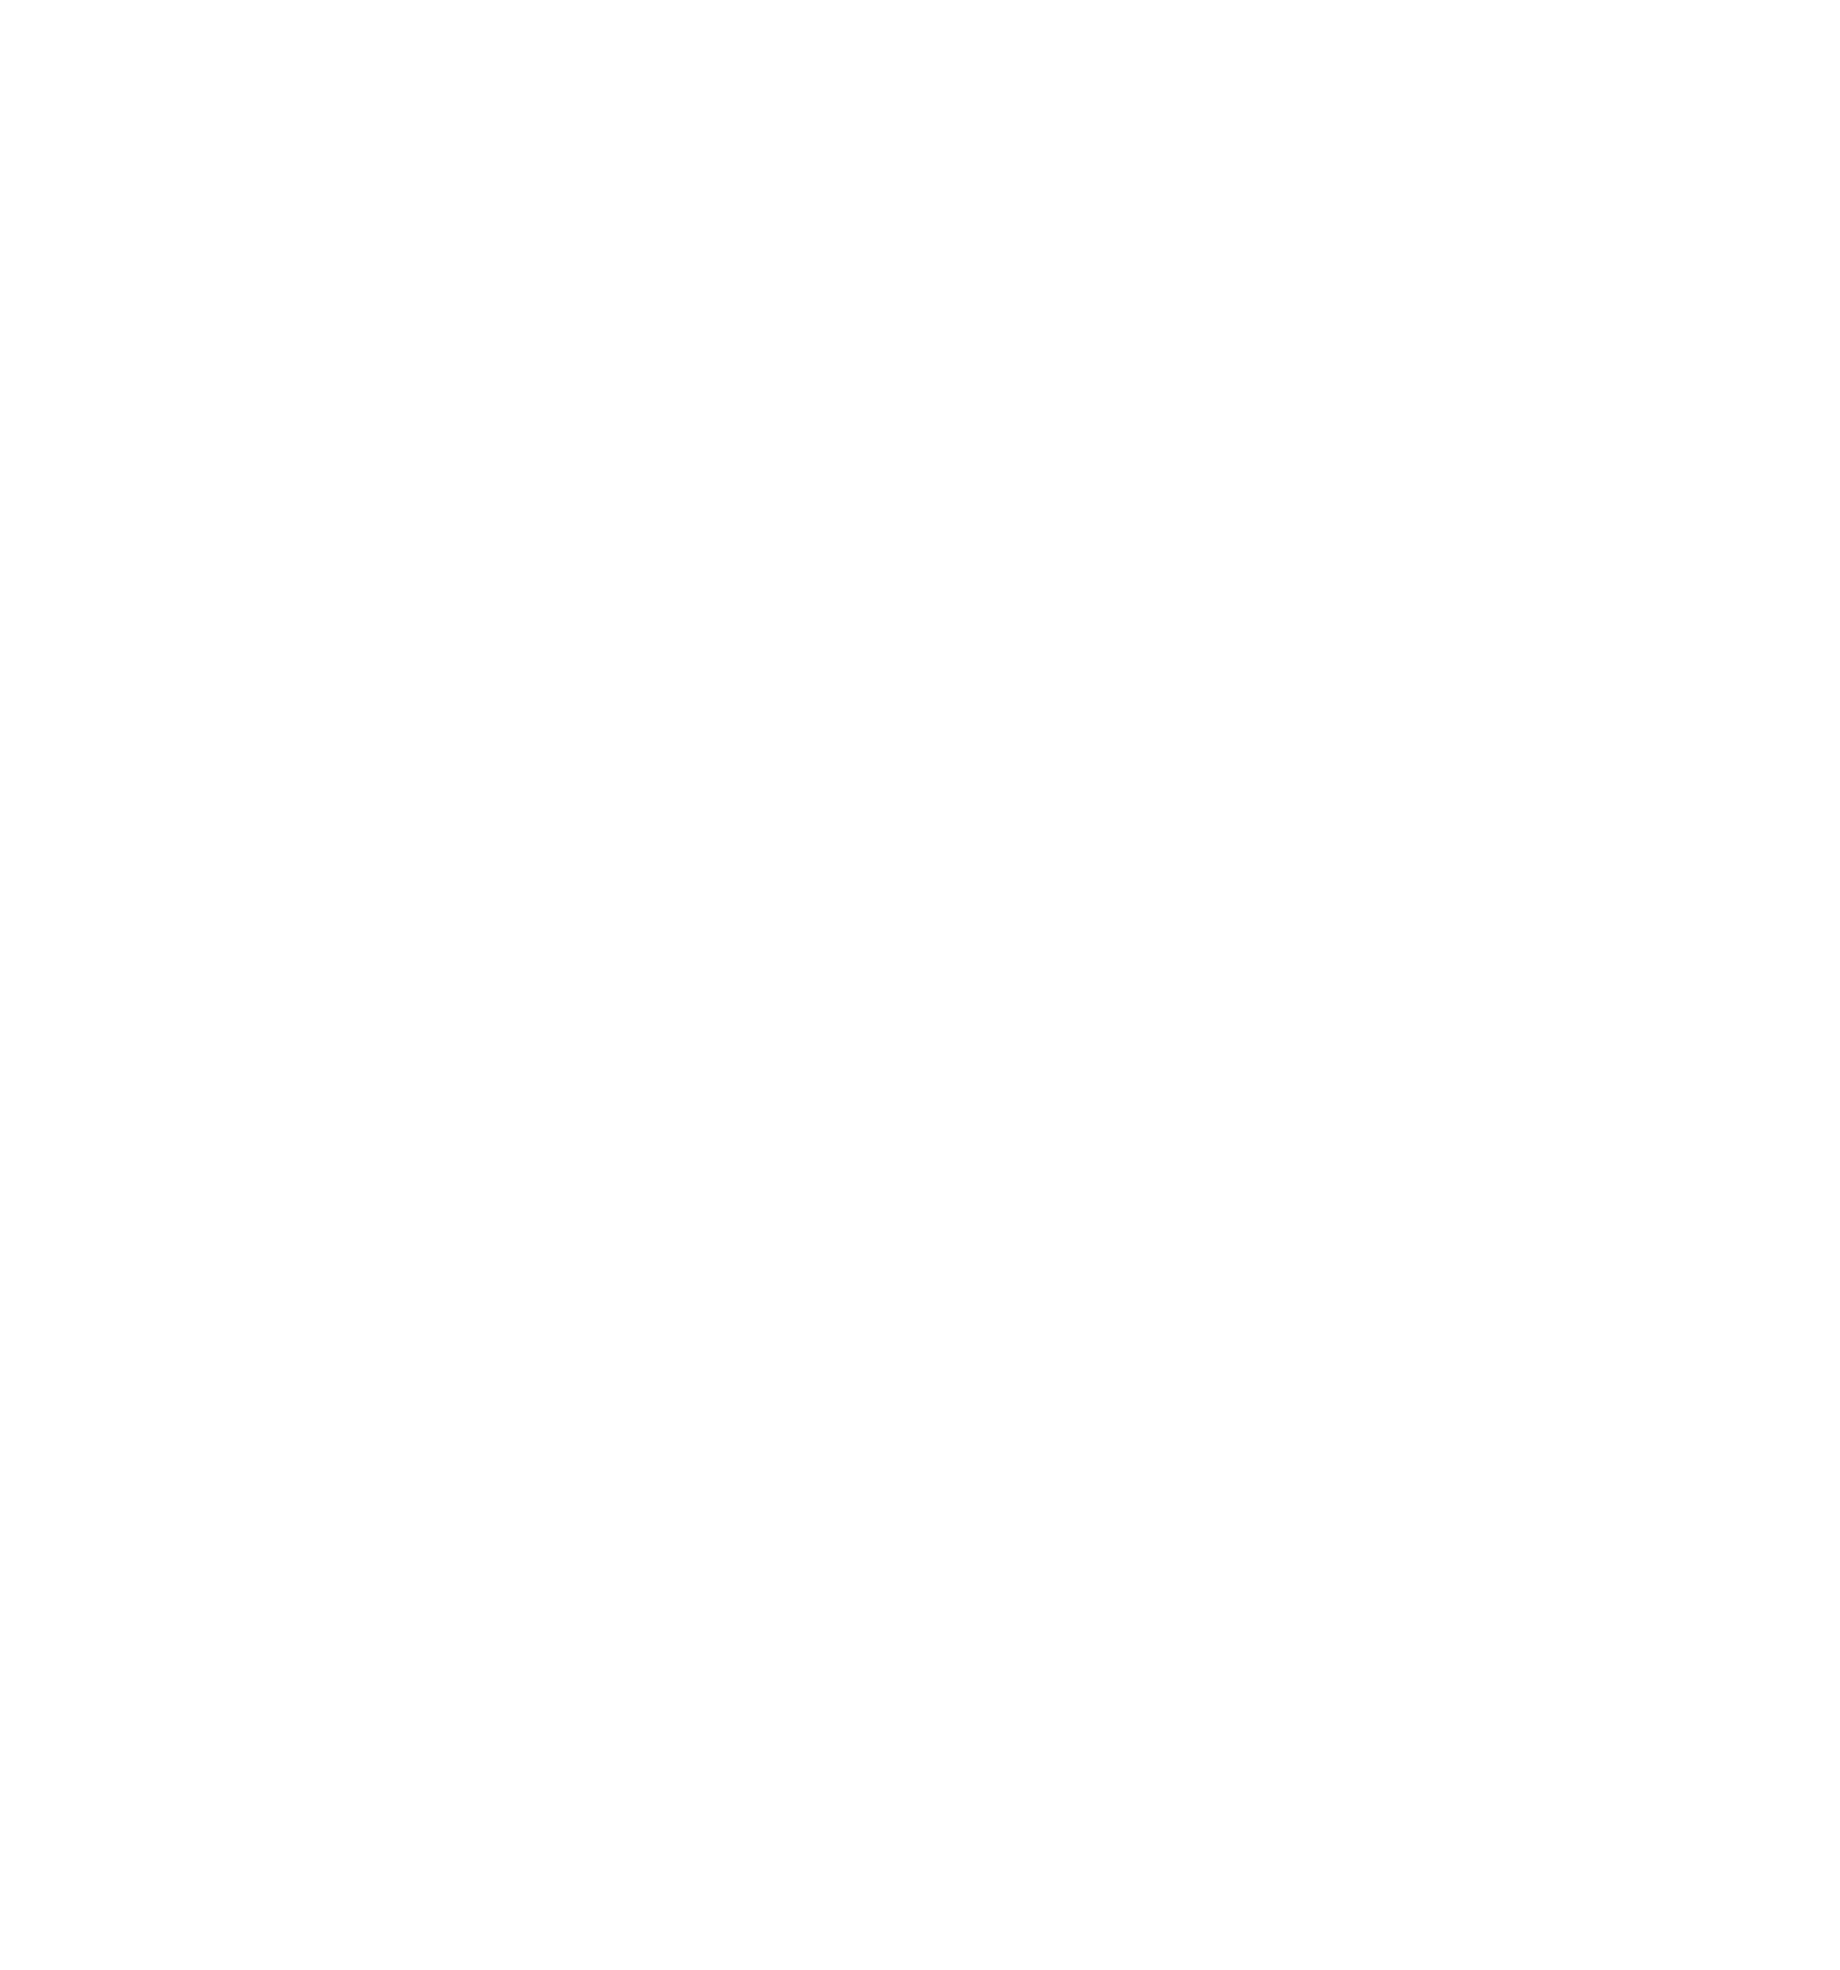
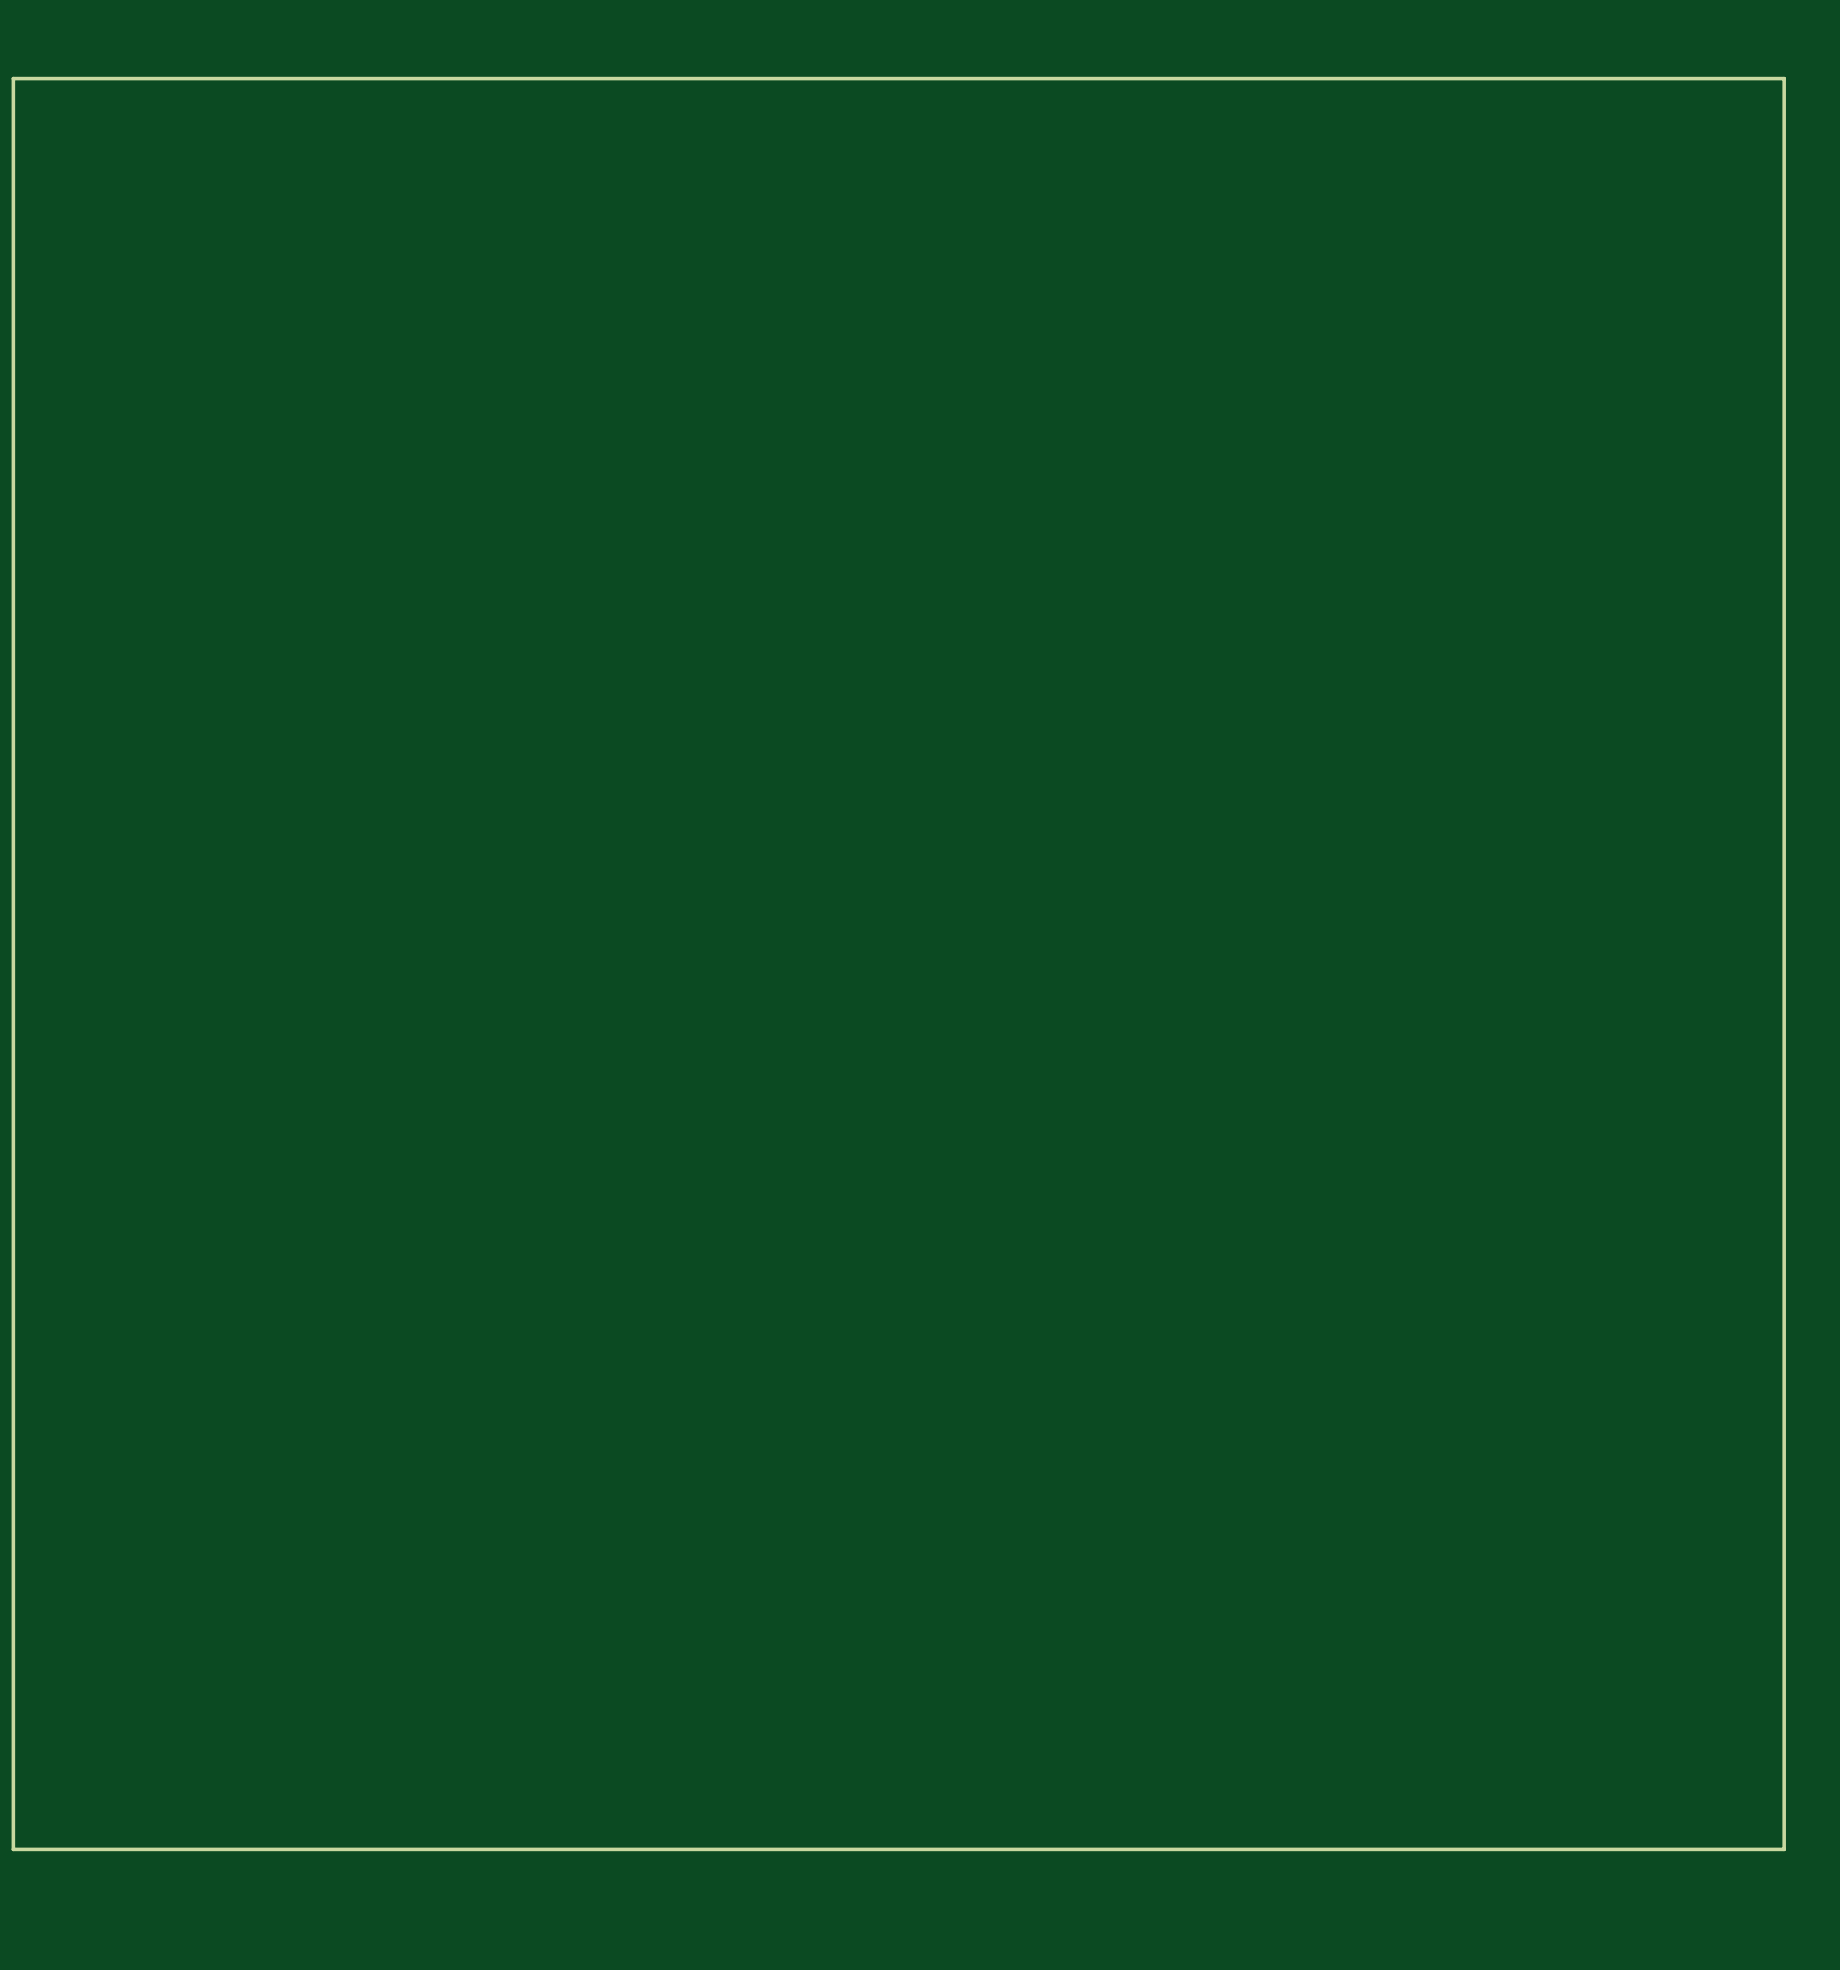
board edge: none -> (13, 78) (1784, 78) (1784, 1849) (13, 1849) (13, 78)

